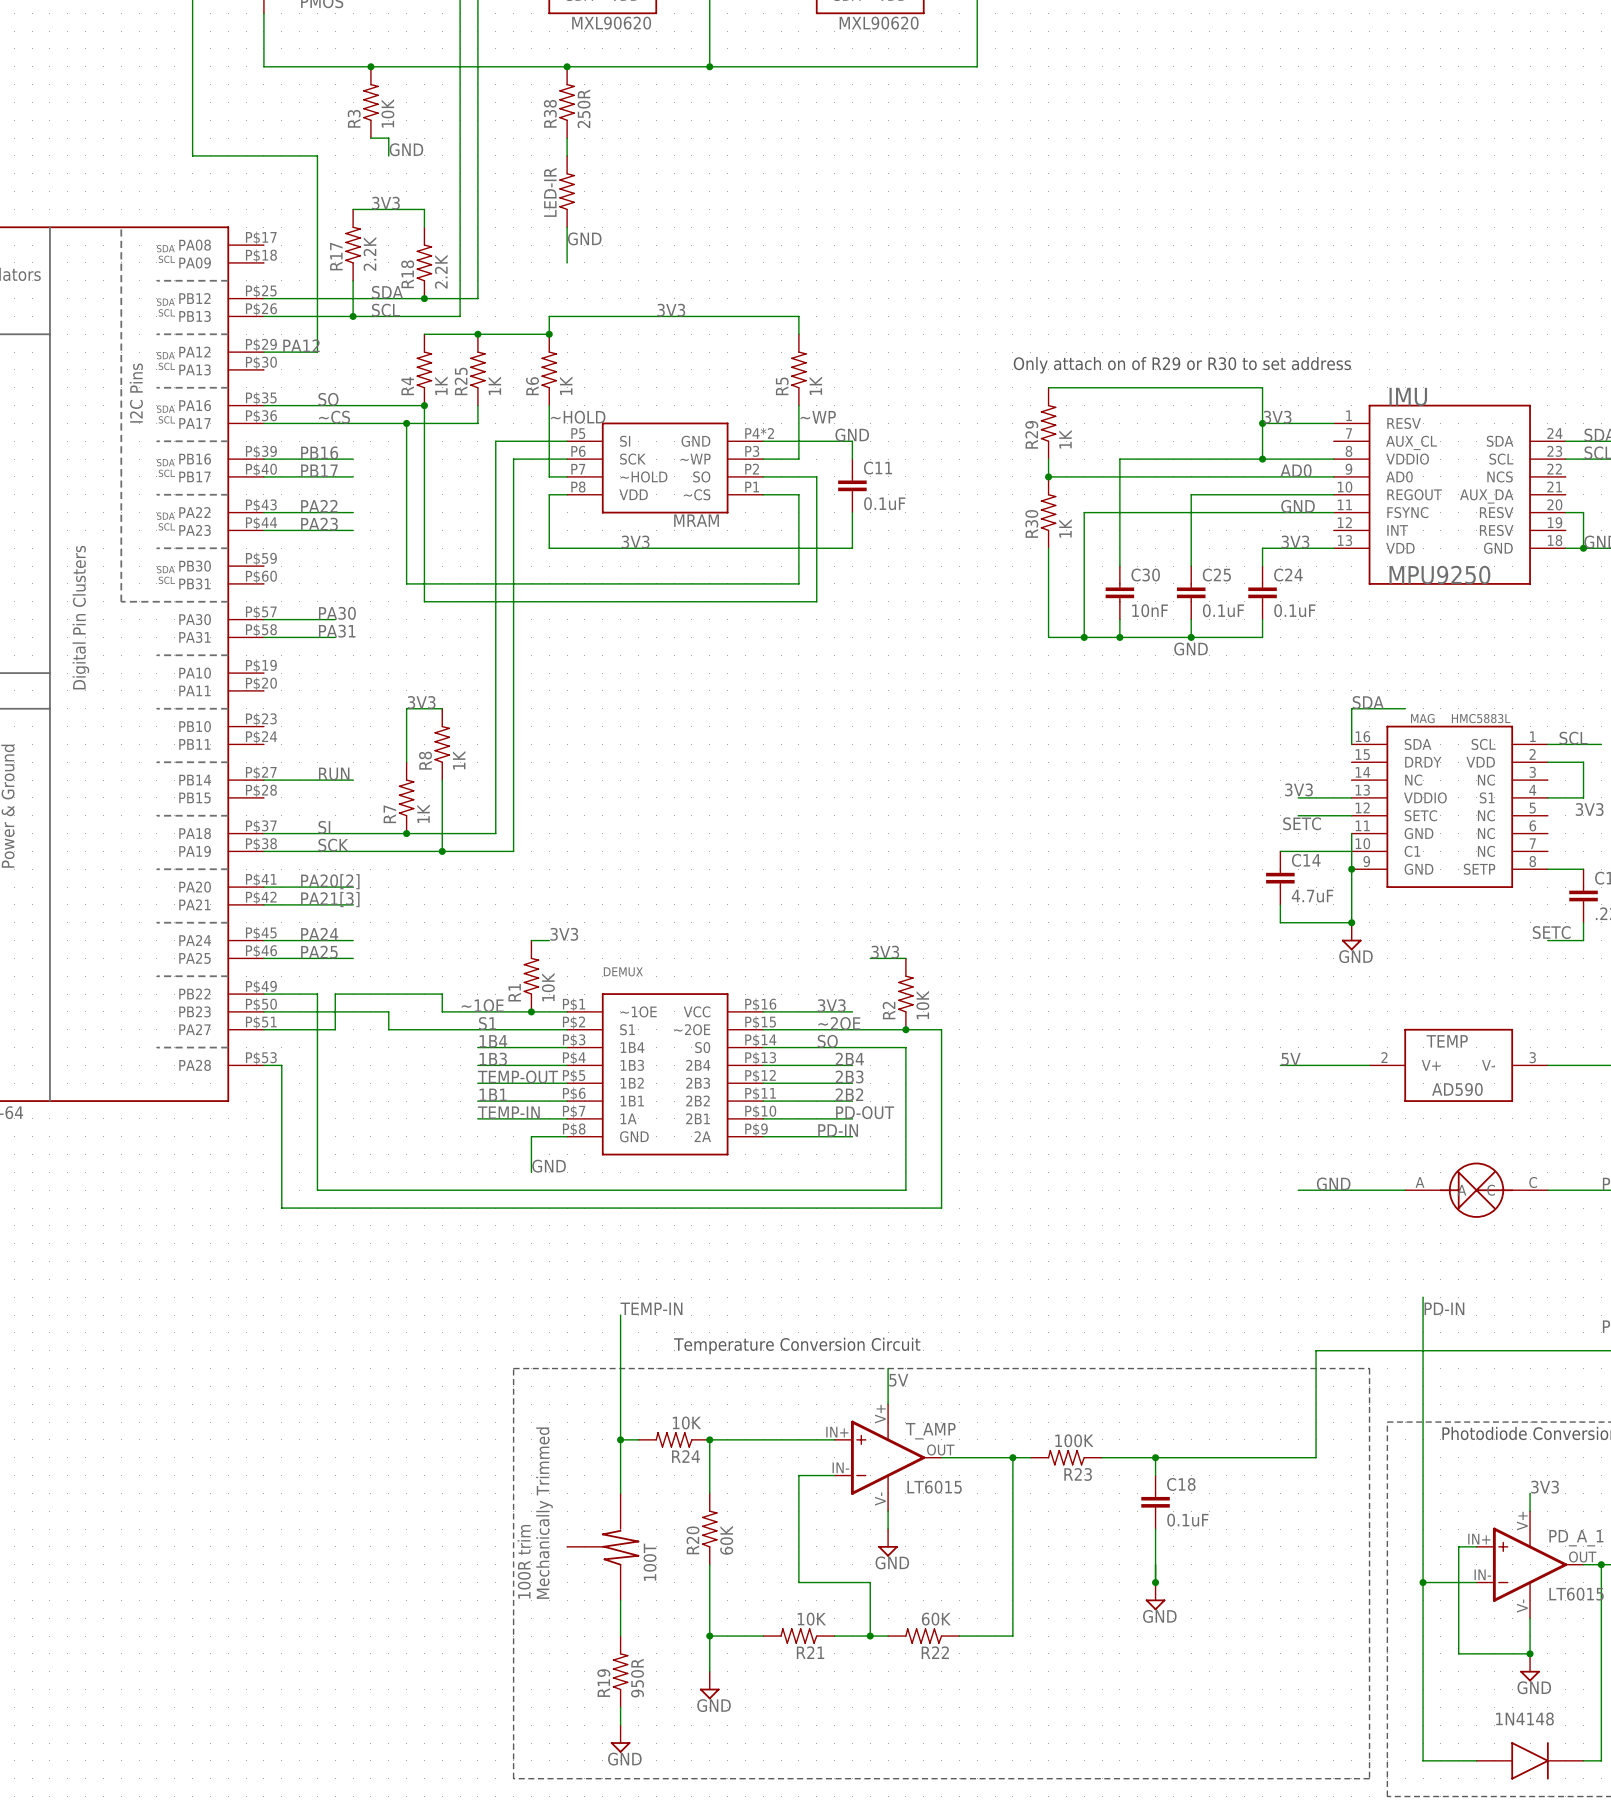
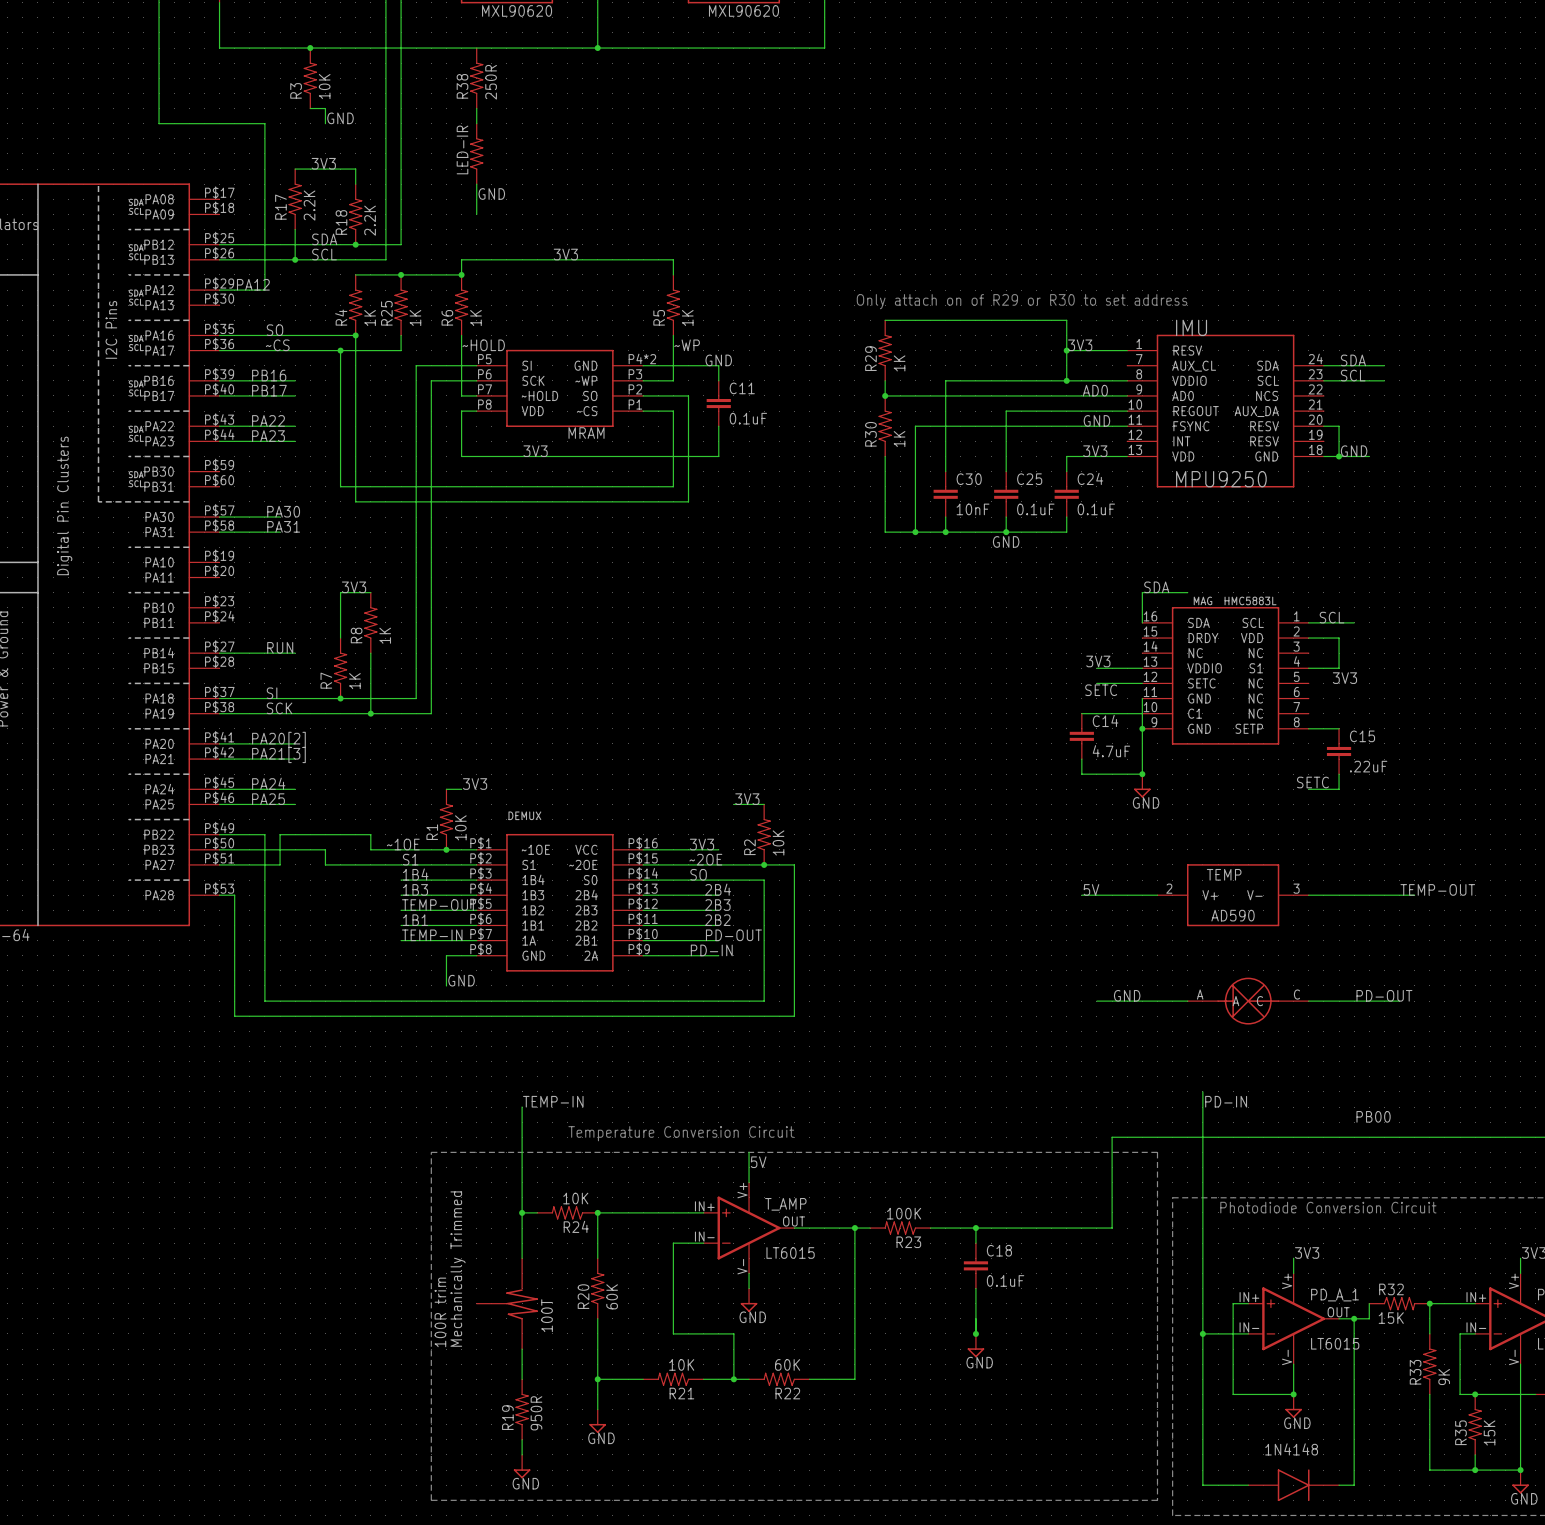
junction: (567, 66) -> none

